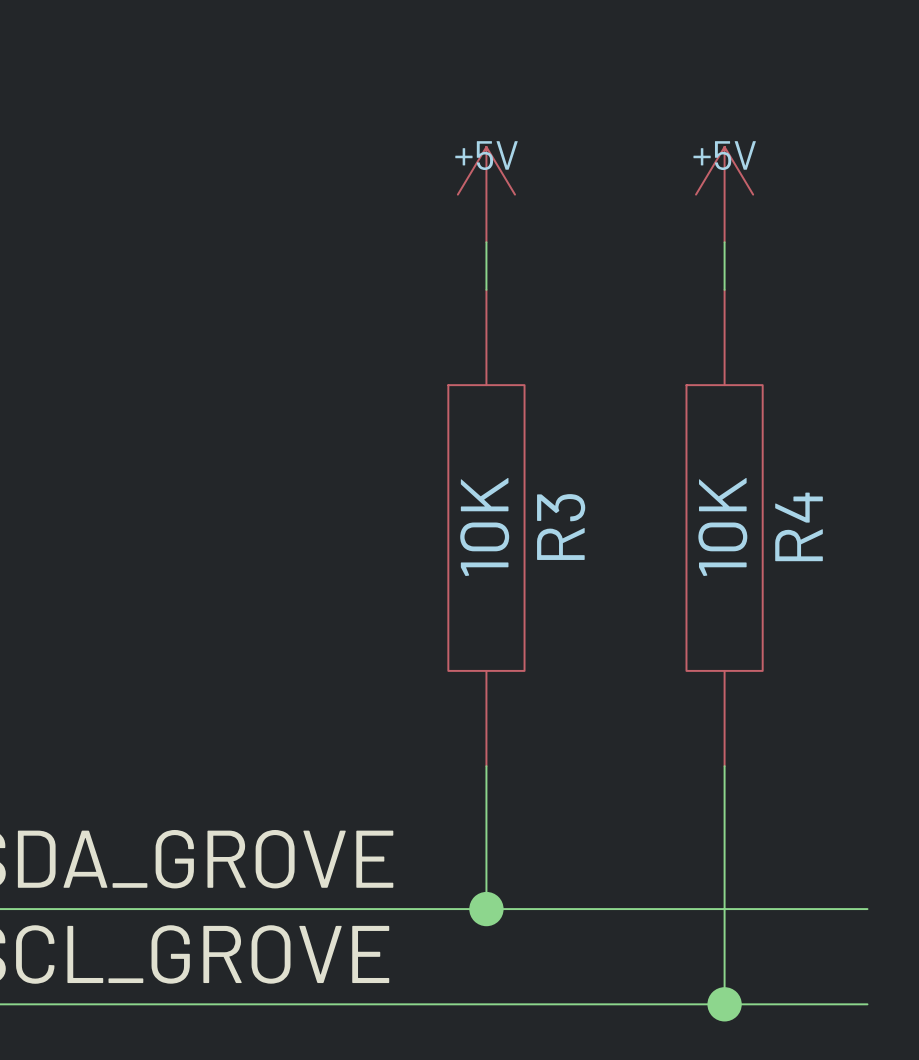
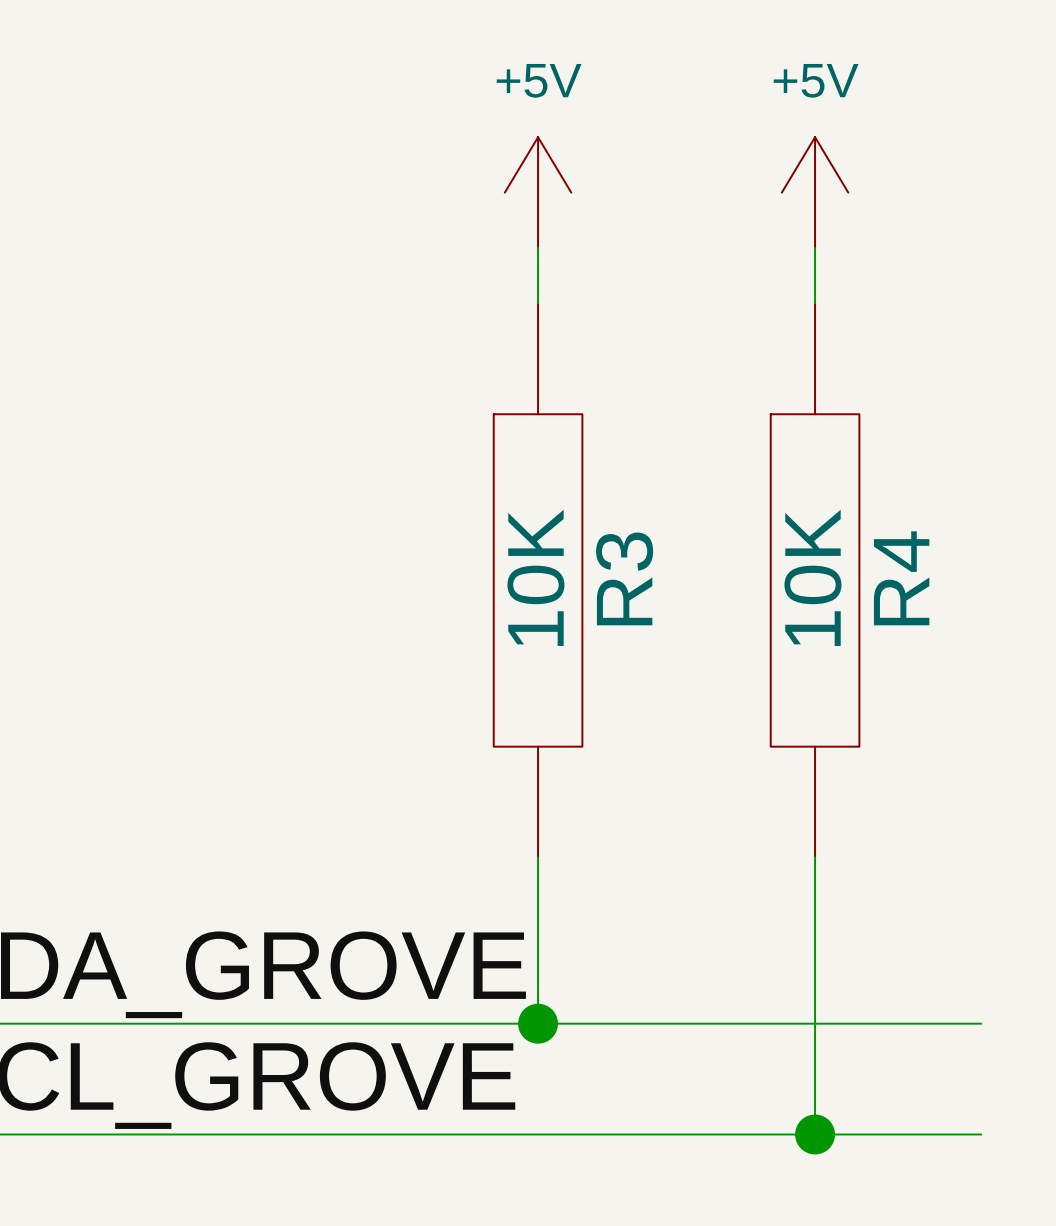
power symbol text position: +5V (486, 155) -> +5V (539, 80)
power symbol text position: +5V (724, 155) -> +5V (816, 80)

